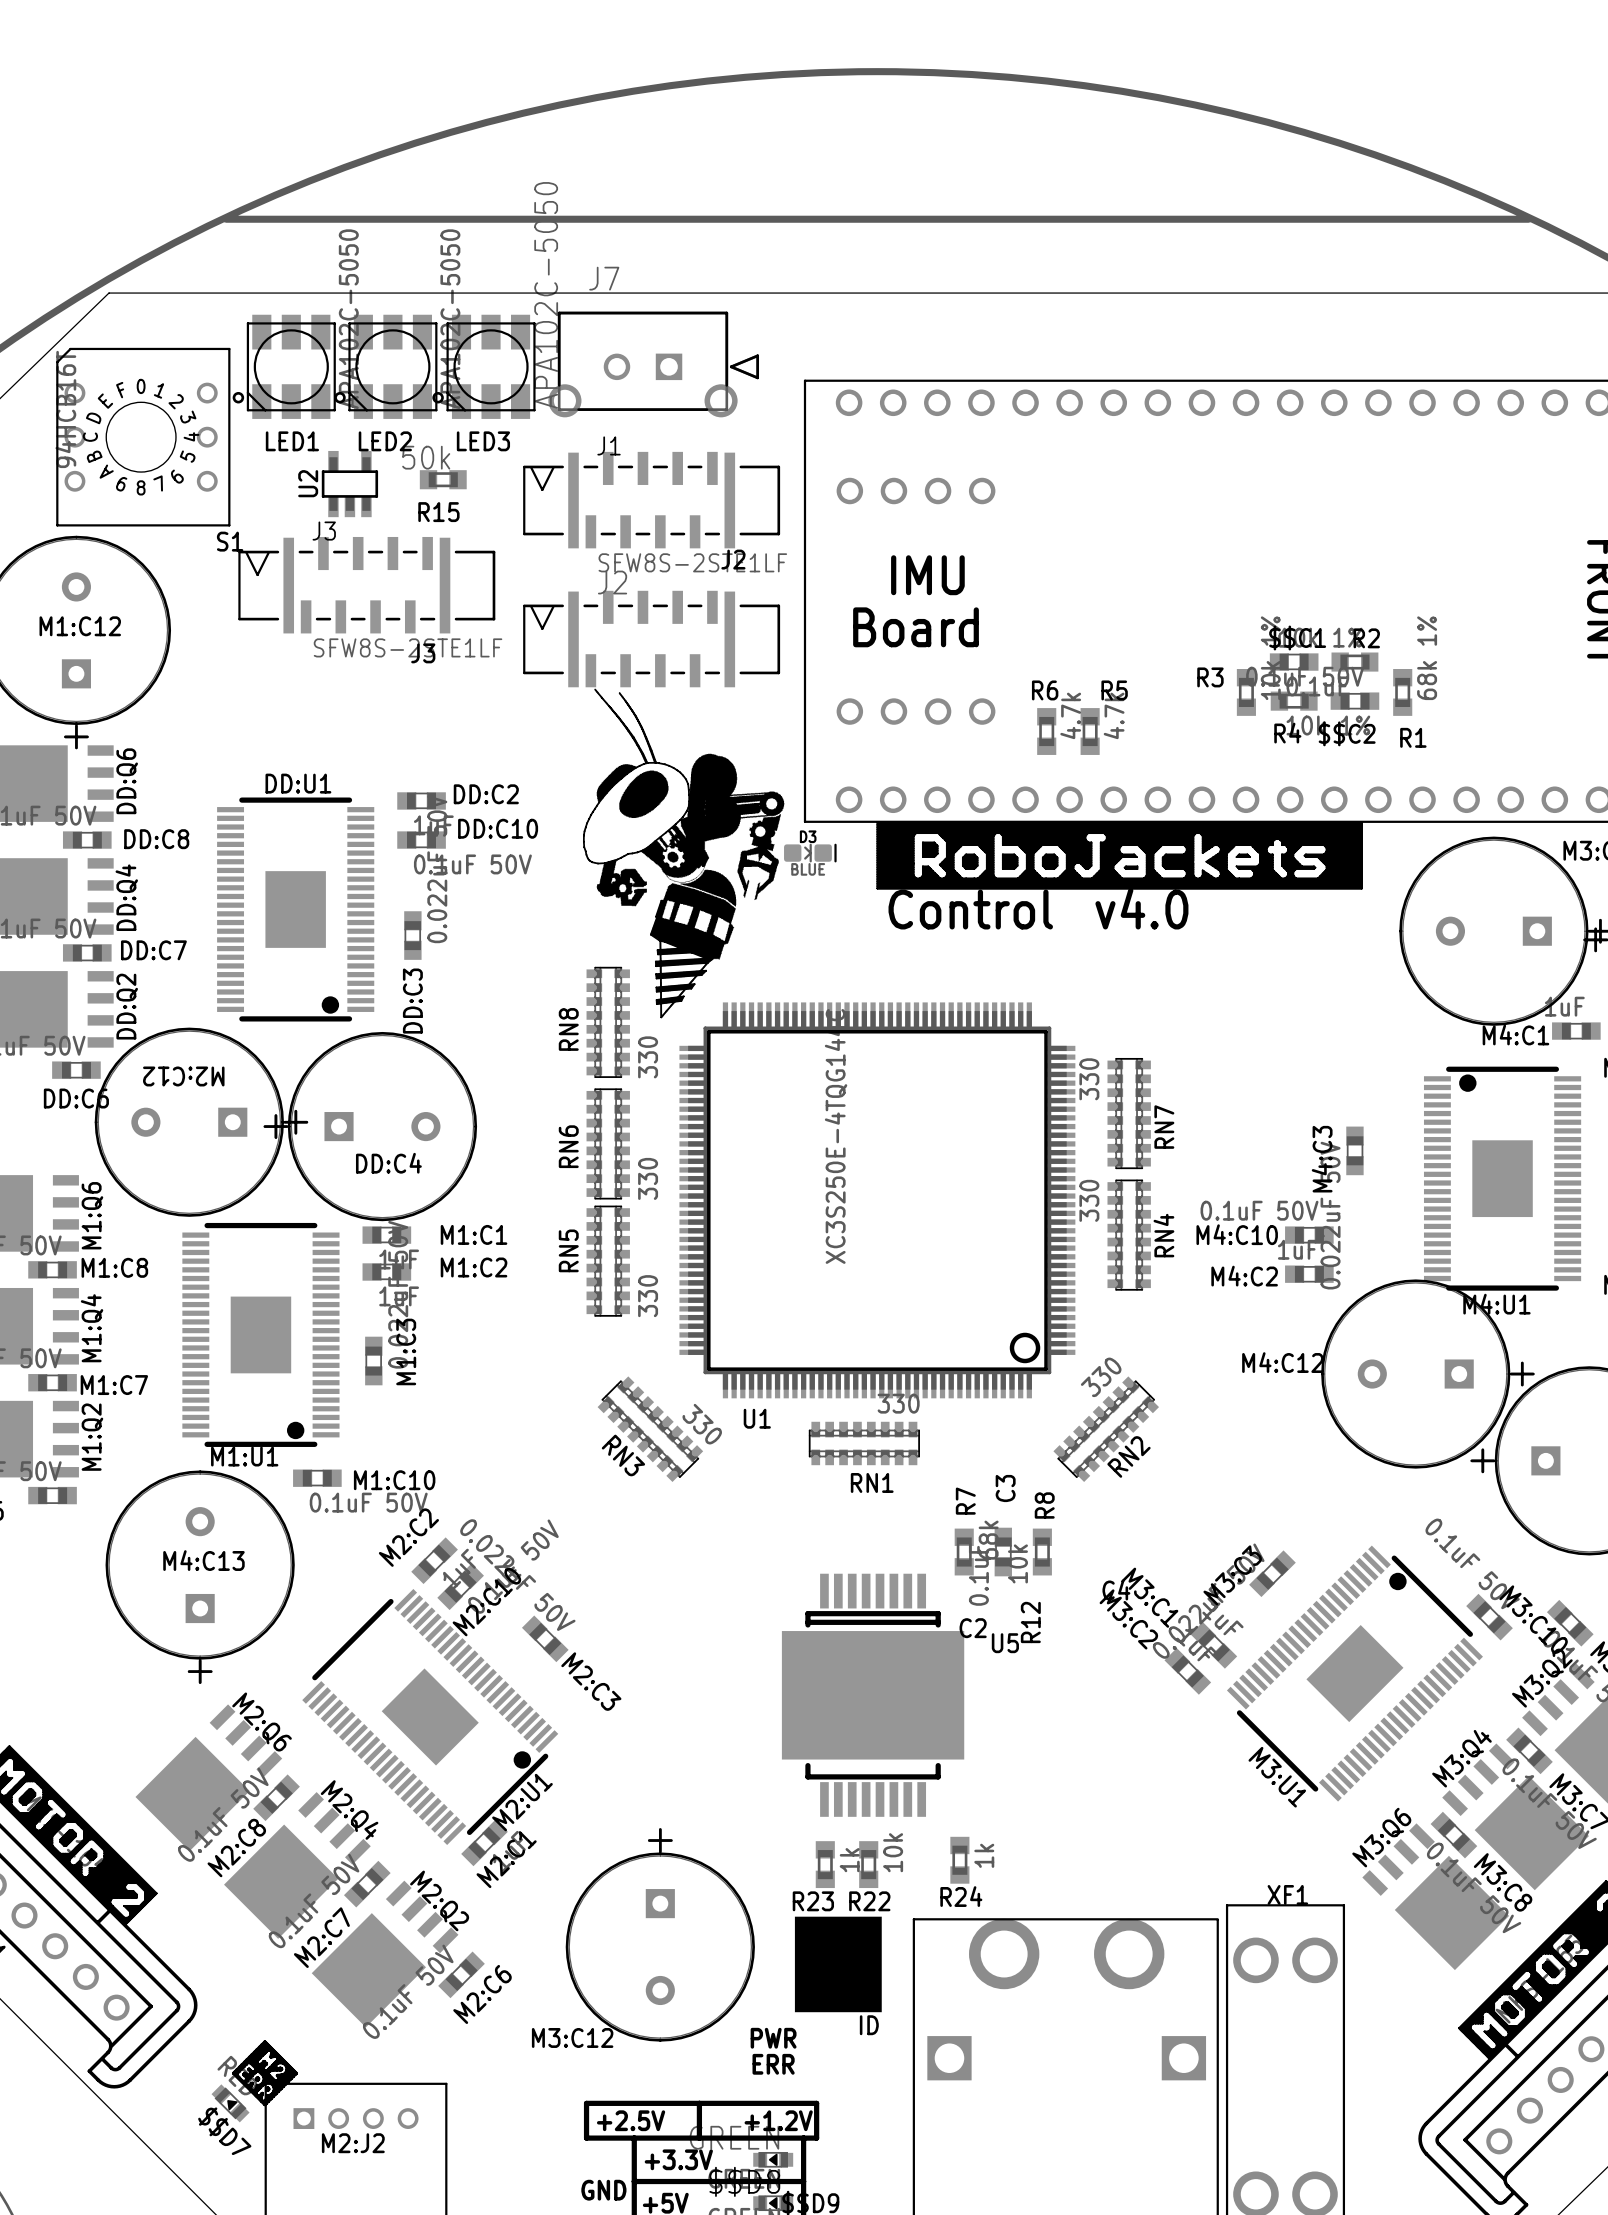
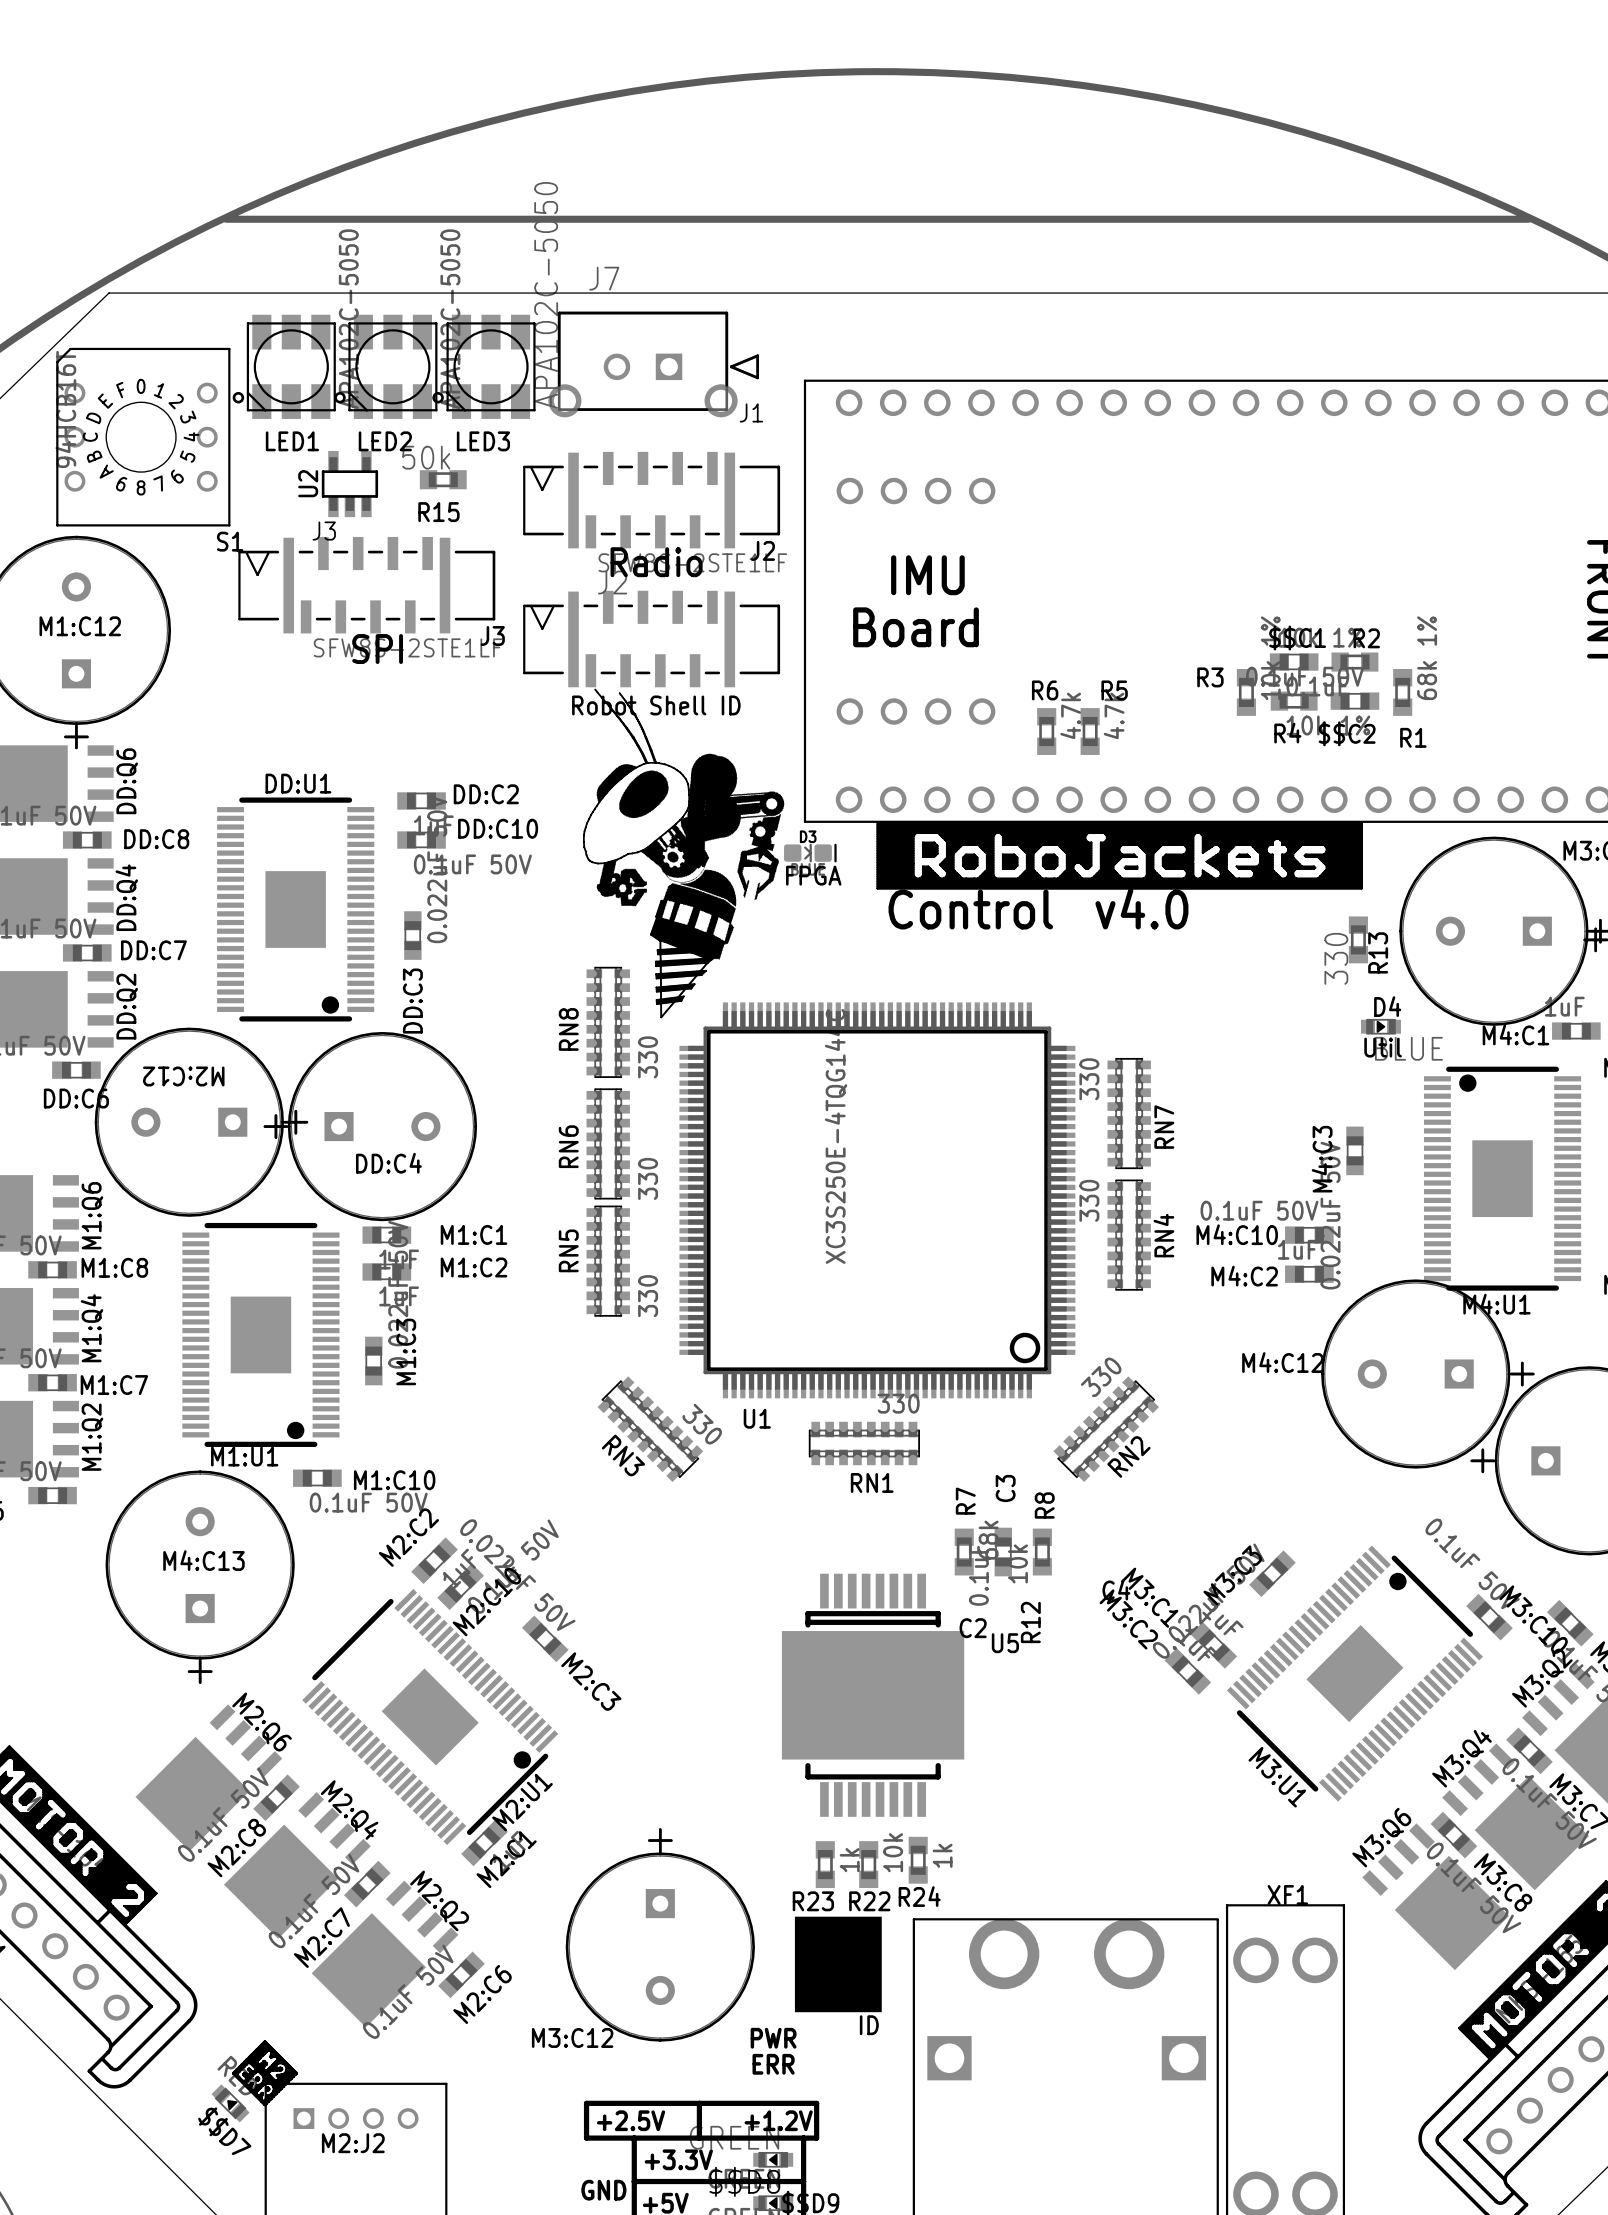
J1 name position: J1 (609, 445) -> J1 (751, 412)
text position: J2 (733, 559) -> J2 (762, 550)
text: none -> Radio (656, 562)
text: none -> SPI (377, 649)
text position: J3 (423, 653) -> J3 (492, 636)
text: none -> Robot Shell ID (656, 705)
text: none -> FPGA (813, 875)
R13: none -> 330 (1358, 939)
D4: none -> BLUE (1381, 1026)
text: none -> Util (1383, 1047)
R24 position: (959, 1860) -> (918, 1860)

